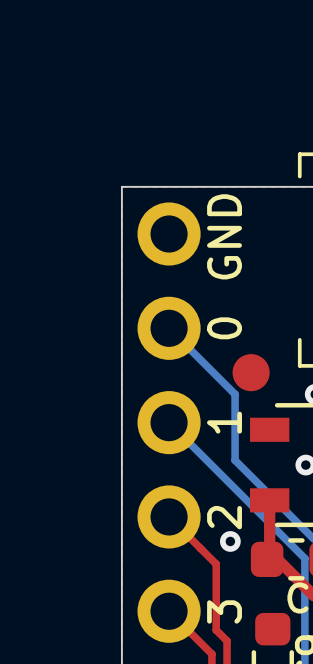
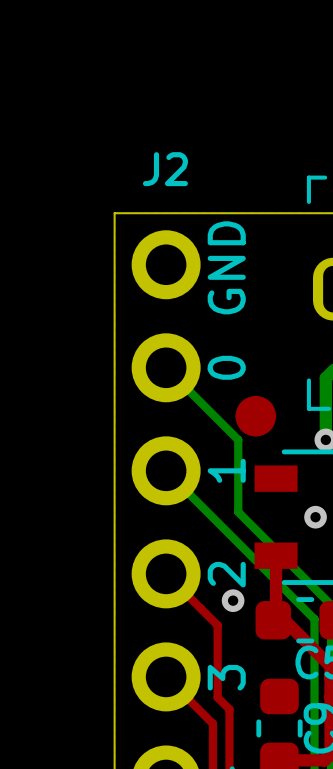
J2 name: none -> J2 (165, 169)

